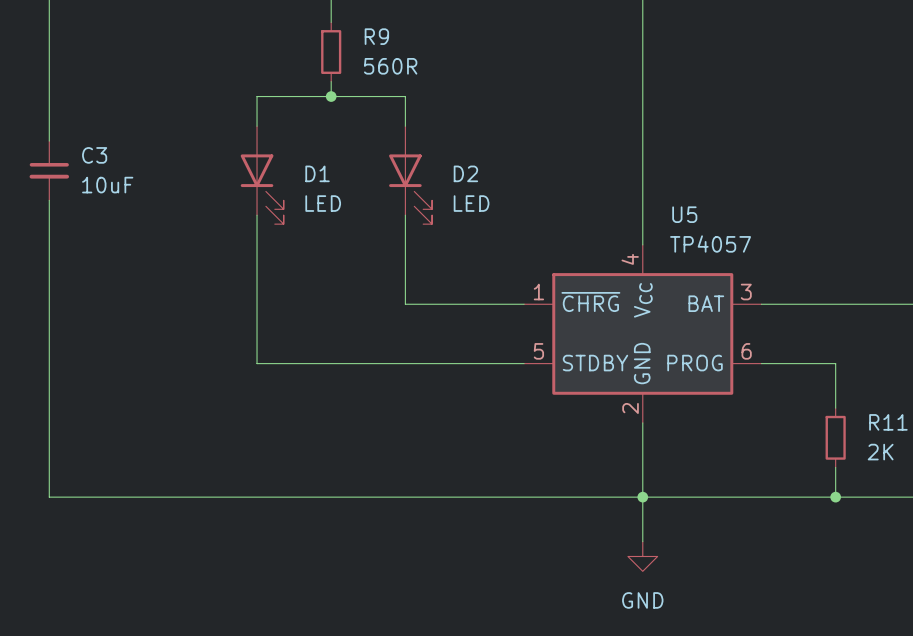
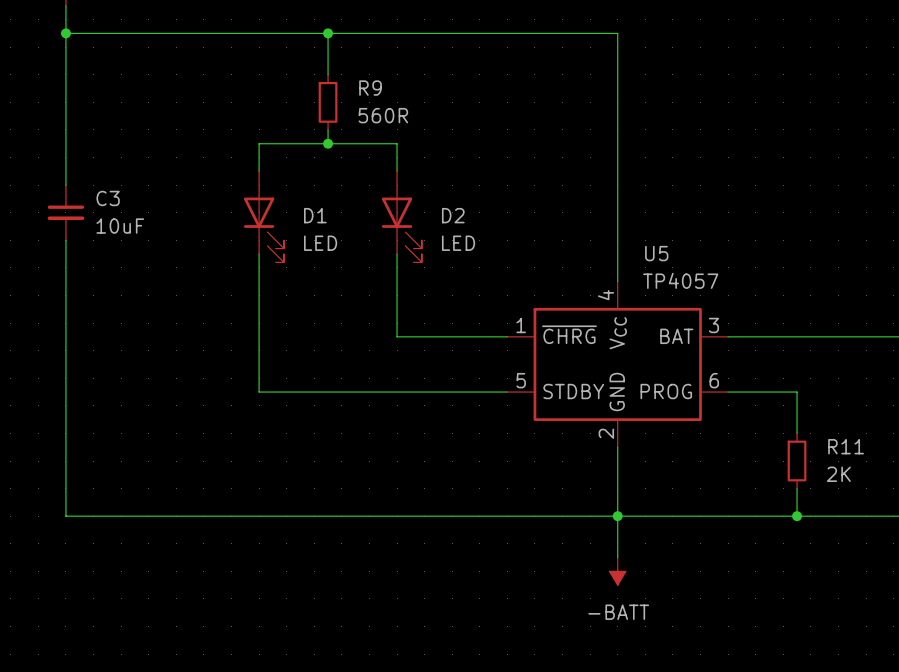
power symbol: GND (642, 556) -> -BATT (617, 571)

